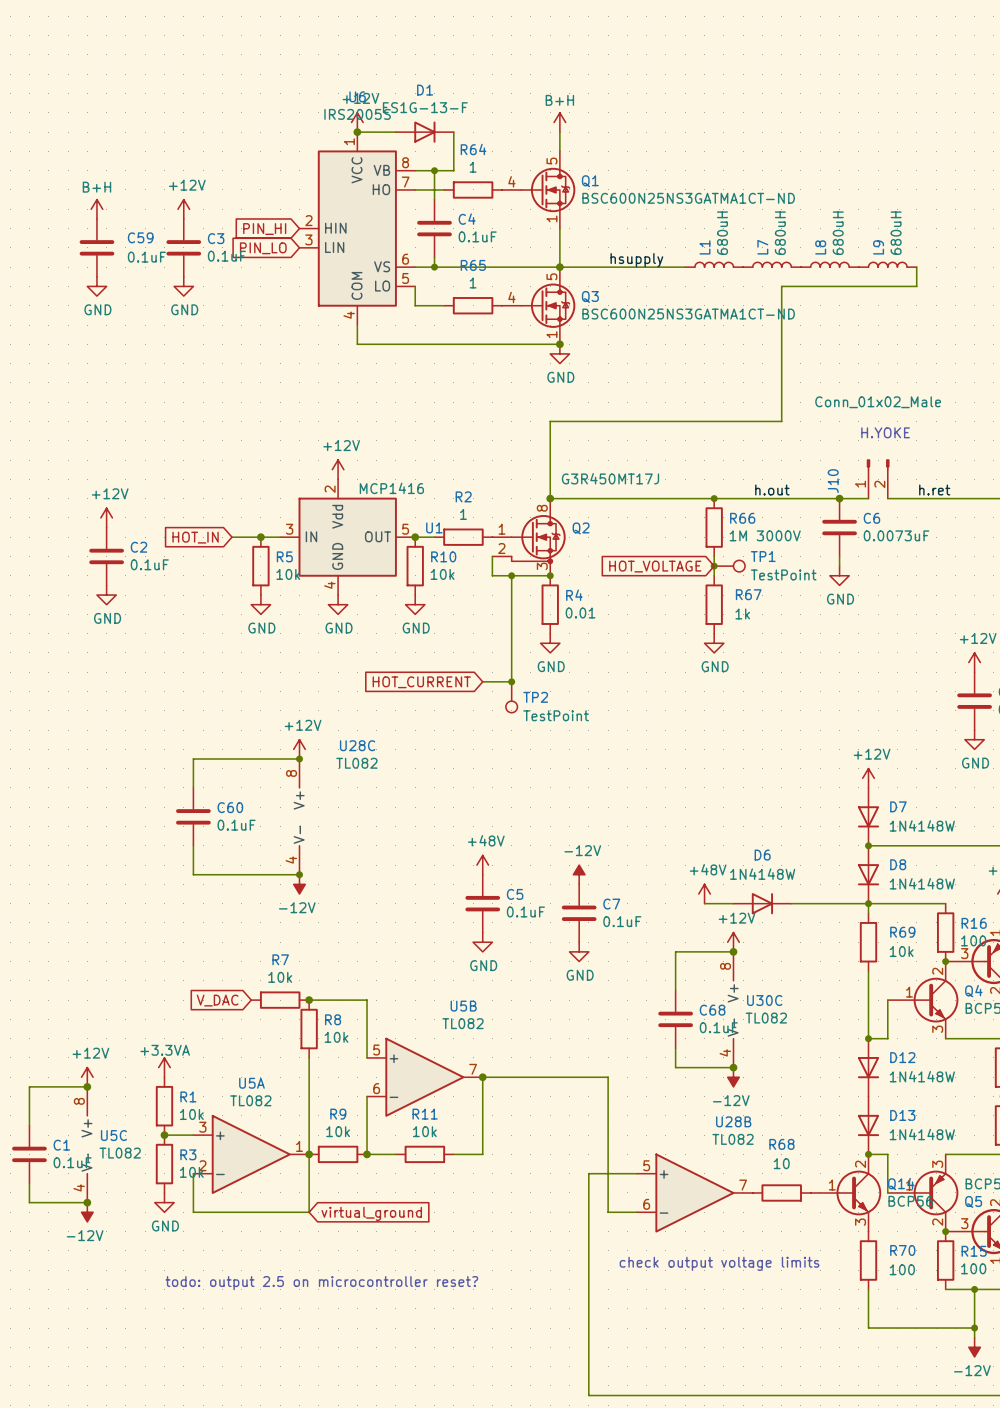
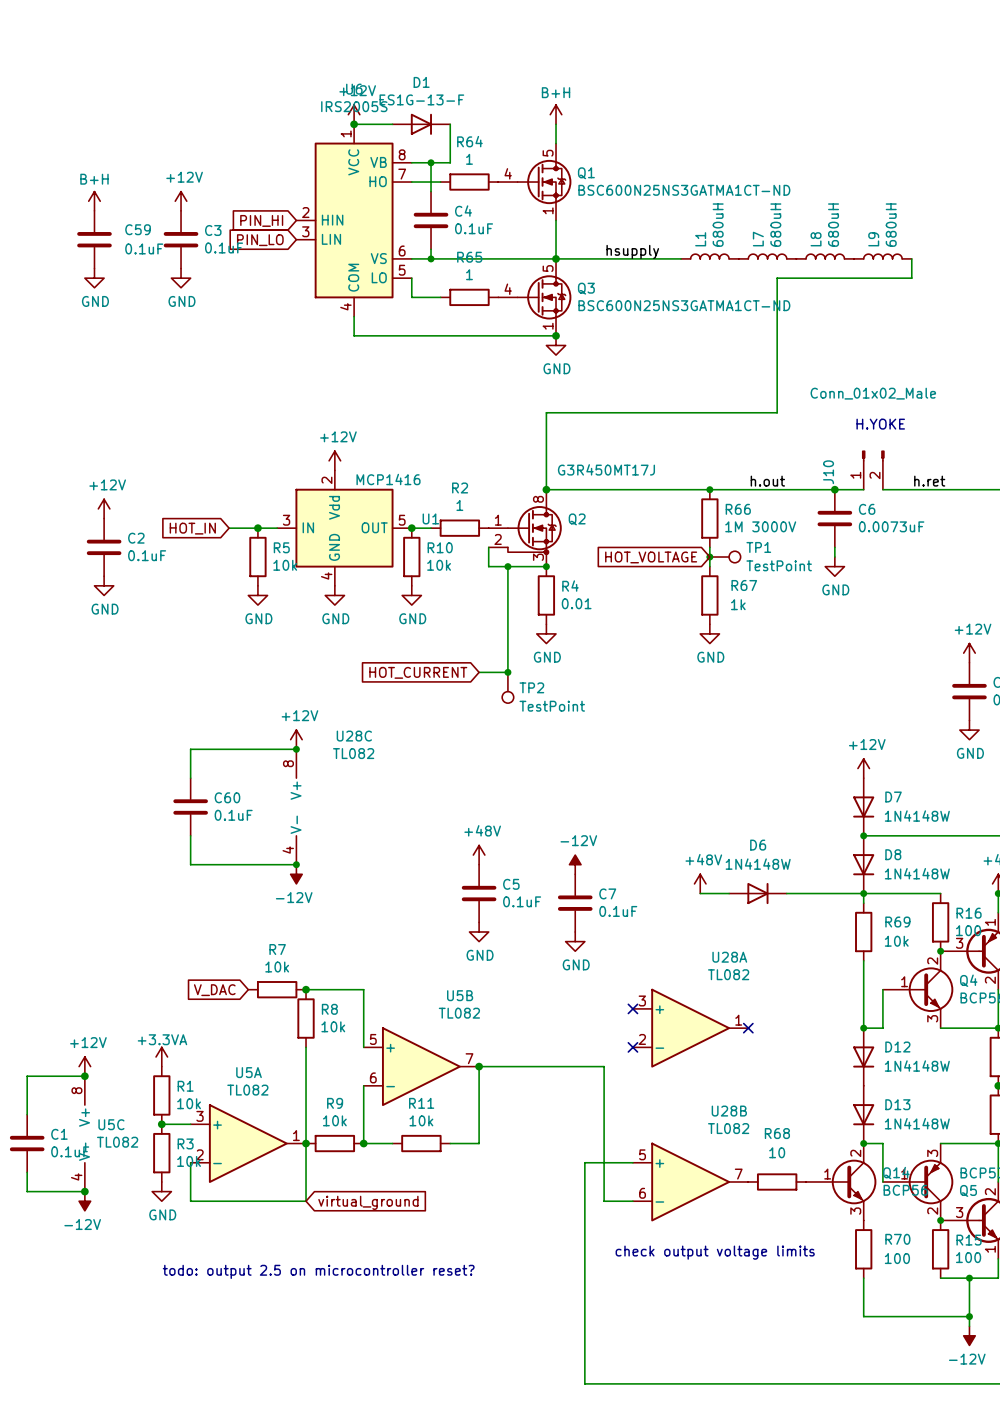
power symbol: +12V (733, 942) -> none
wire: (733, 951) (675, 951) (675, 990) -> none
junction: (733, 951) -> none
U30C: TL082 (733, 1009) -> none
no-connect mark: none -> (632, 1008)
C68: 0.1uF (675, 1019) -> none
U28A: none -> TL082 (690, 1028)
no-connect mark: none -> (748, 1028)
wire: (675, 1048) (675, 1067) (733, 1067) -> none
no-connect mark: none -> (632, 1047)
junction: (733, 1067) -> none
power symbol: -12V (733, 1077) -> none

